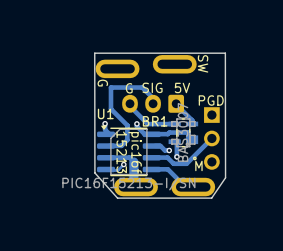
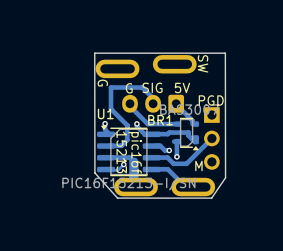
BR1 footprint: [168, 118, 199, 161] -> [174, 117, 200, 151]

